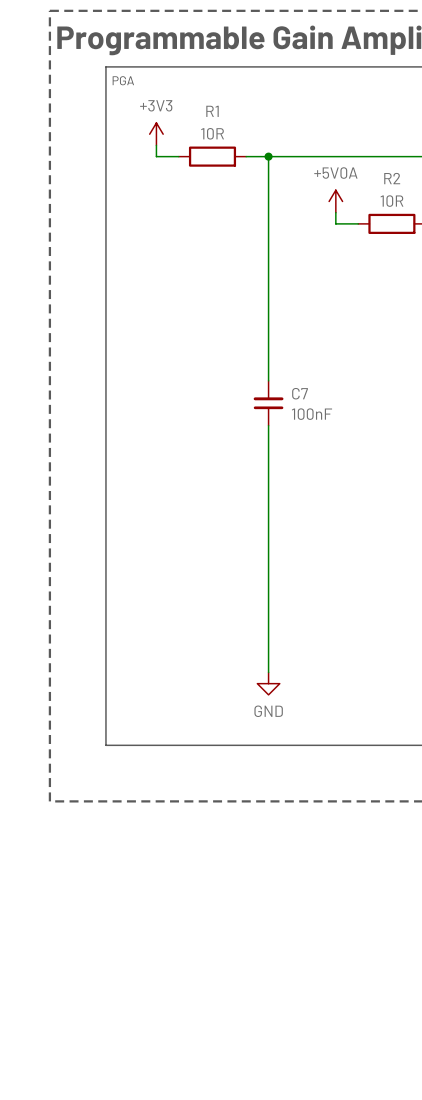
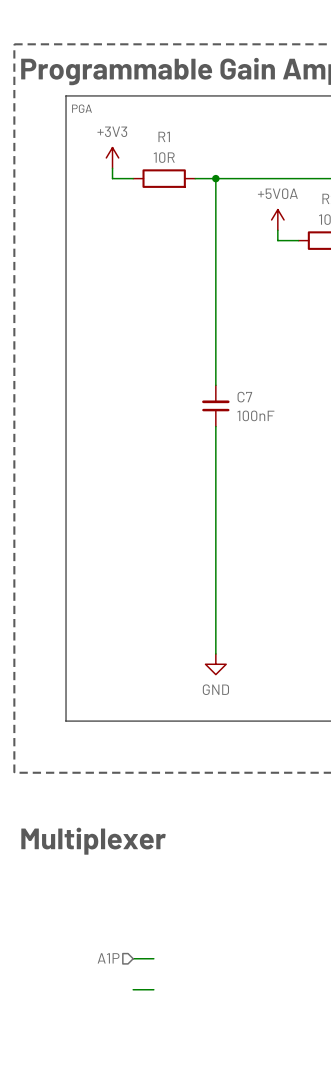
text: none -> Multiplexer (93, 841)
hierarchical label: none -> A1P (108, 958)
wire: none -> (133, 958) (153, 958)
wire: none -> (133, 989) (153, 989)

